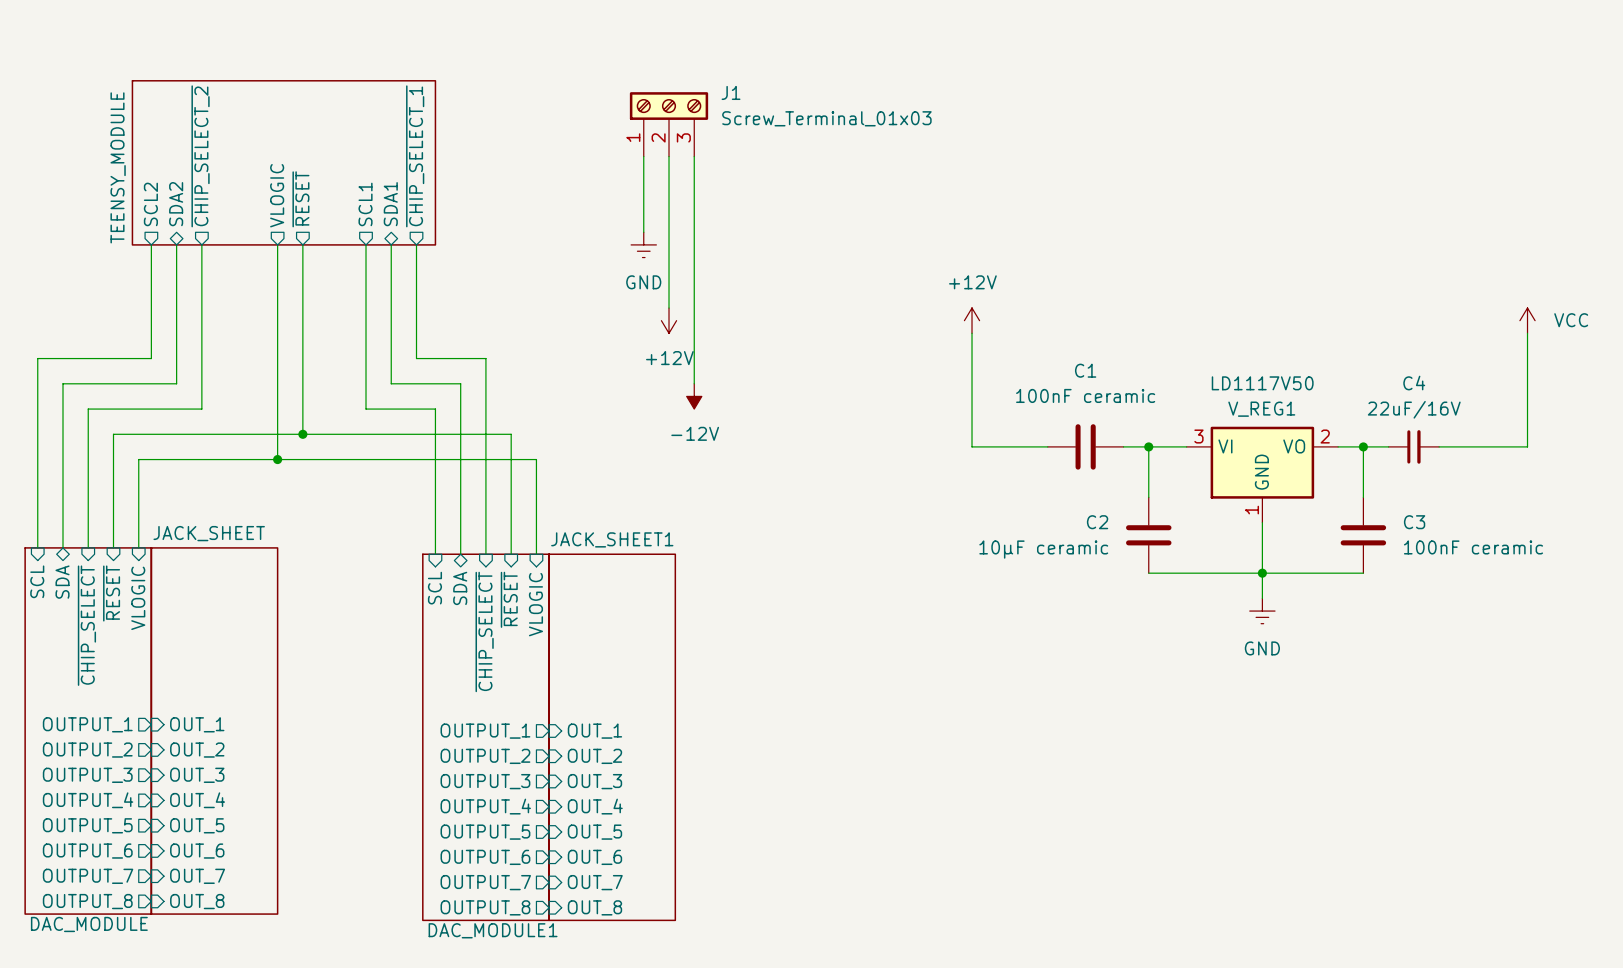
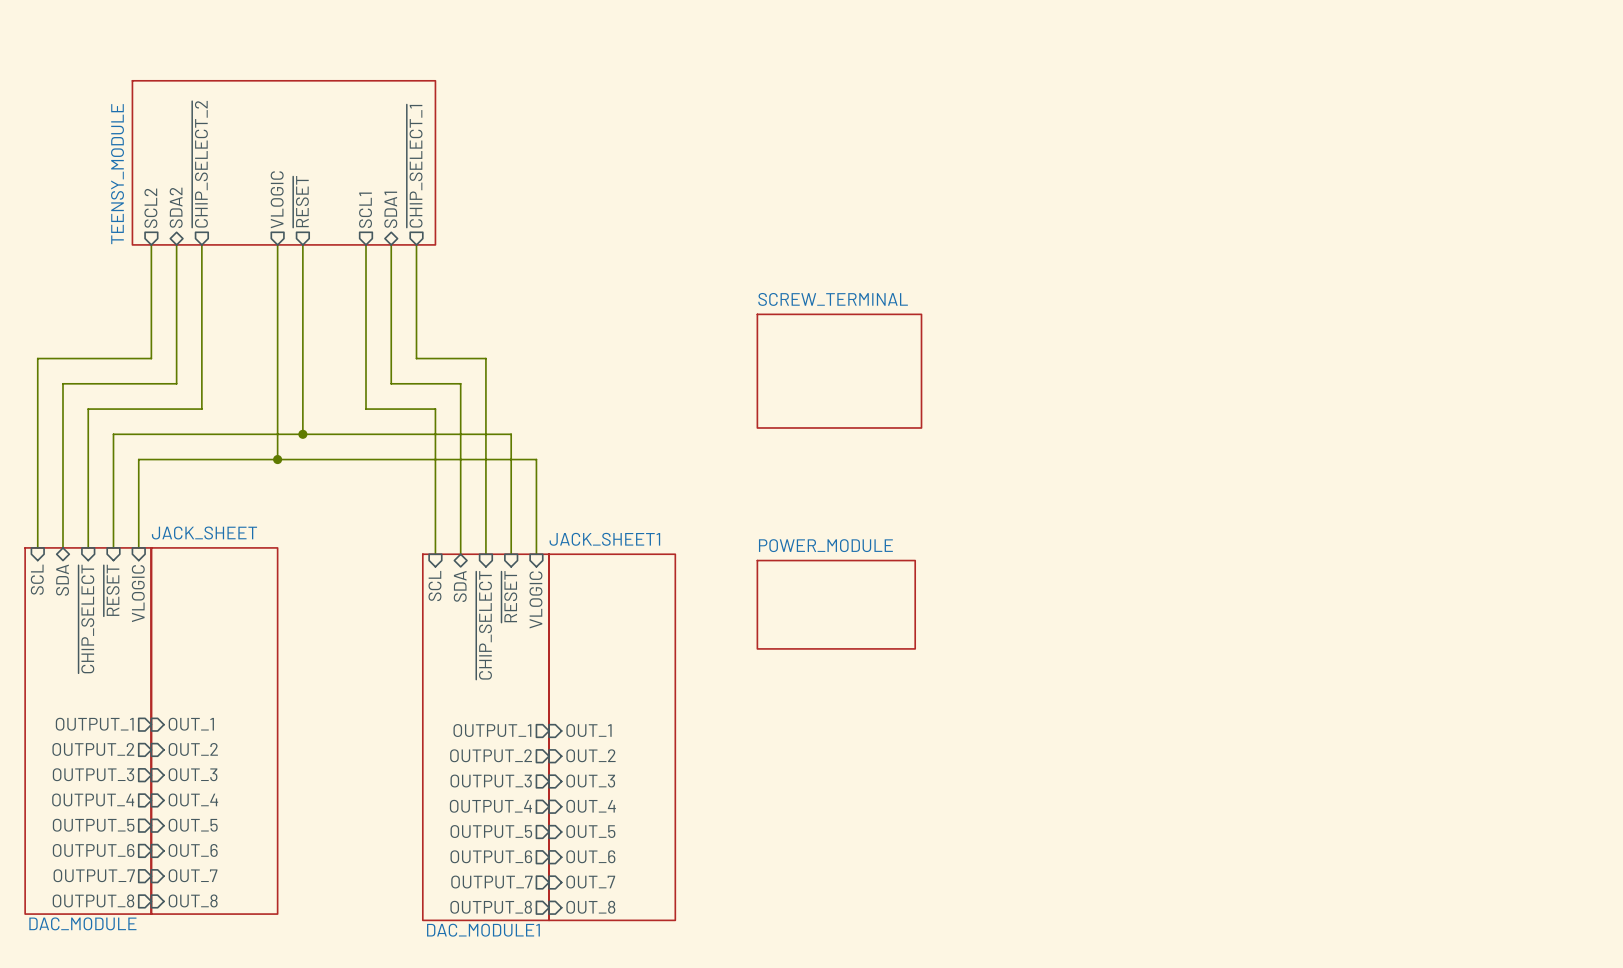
J1: Screw_Terminal_01x03 (669, 124) -> none
wire: (643, 156) (643, 232) -> none
wire: (669, 156) (669, 308) -> none
wire: (694, 156) (694, 383) -> none
power symbol: GND (643, 244) -> none
power symbol: +12V (669, 320) -> none
power symbol: +12V (972, 320) -> none
power symbol: VCC (1527, 320) -> none
wire: (972, 333) (972, 446) (1047, 446) -> none
wire: (1527, 333) (1527, 446) (1439, 446) -> none
sheet SCREW_TERMINAL: none -> (839, 371)
power symbol: -12V (694, 396) -> none
C1: 100nF ceramic (1085, 446) -> none
wire: (1123, 446) (1186, 446) -> none
wire: (1148, 446) (1148, 497) -> none
junction: (1148, 446) -> none
wire: (1338, 446) (1388, 446) -> none
wire: (1363, 446) (1363, 497) -> none
junction: (1363, 446) -> none
C4: (1413, 446) -> none
V_REG1: LD1117V50 (1262, 474) -> none
wire: (1262, 522) (1262, 598) -> none
C2: 10µF ceramic (1148, 535) -> none
C3: 100nF ceramic (1363, 535) -> none
wire: (1148, 573) (1363, 573) -> none
junction: (1262, 573) -> none
sheet POWER_MODULE: none -> (836, 604)
power symbol: GND (1262, 611) -> none

